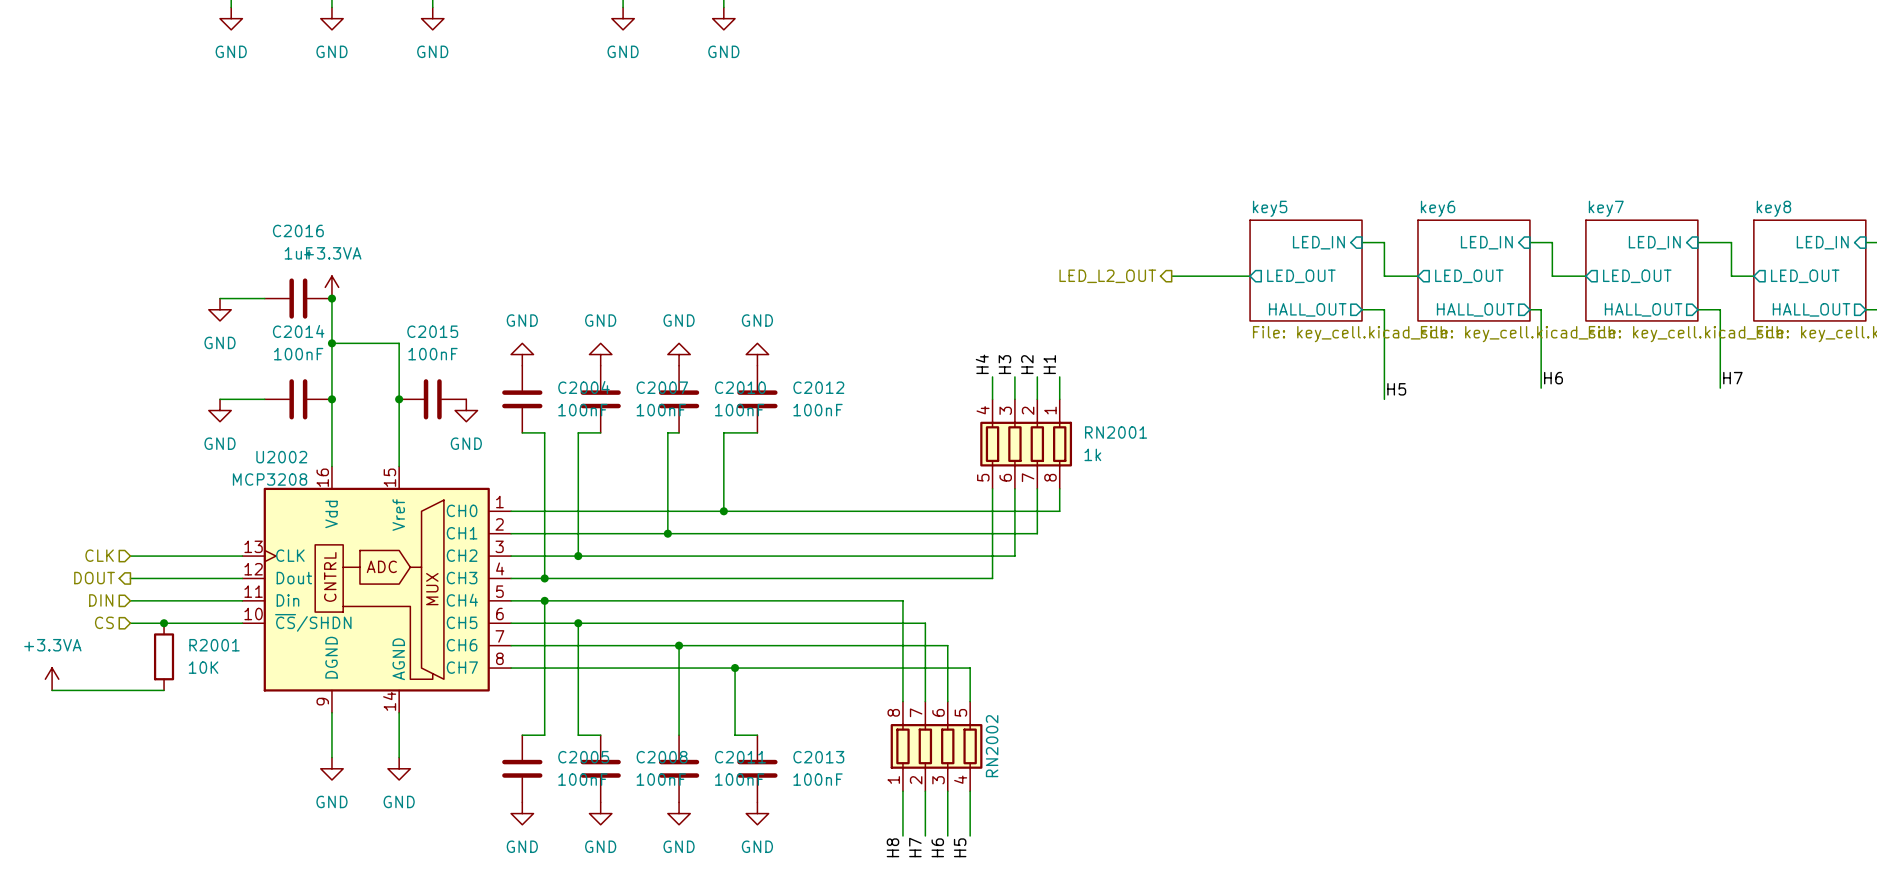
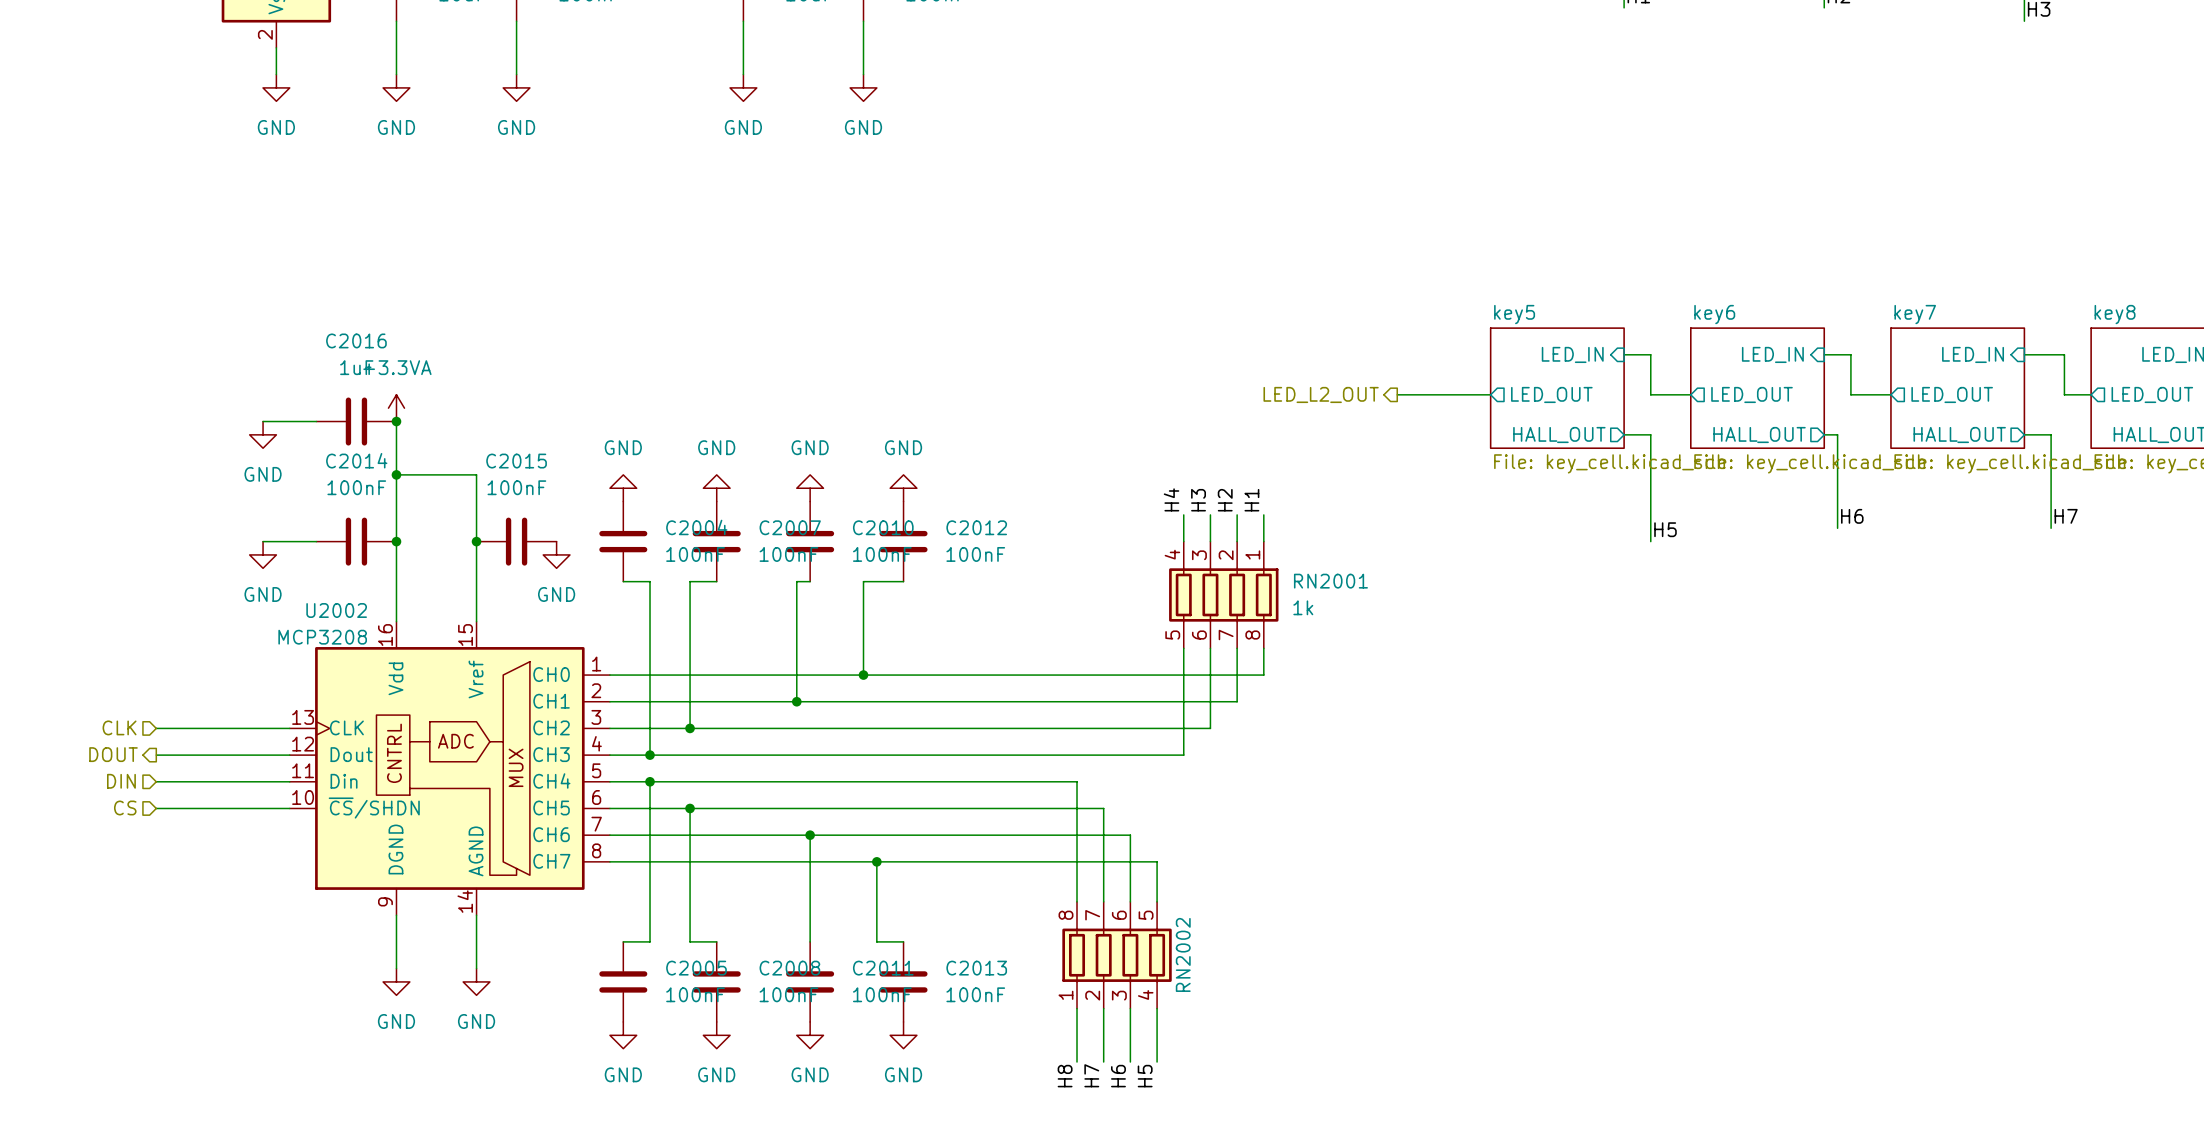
junction: (164, 623) -> none
R2001: 10K (164, 656) -> none
power symbol: +3.3VA (52, 679) -> none
wire: (52, 690) (164, 690) -> none

